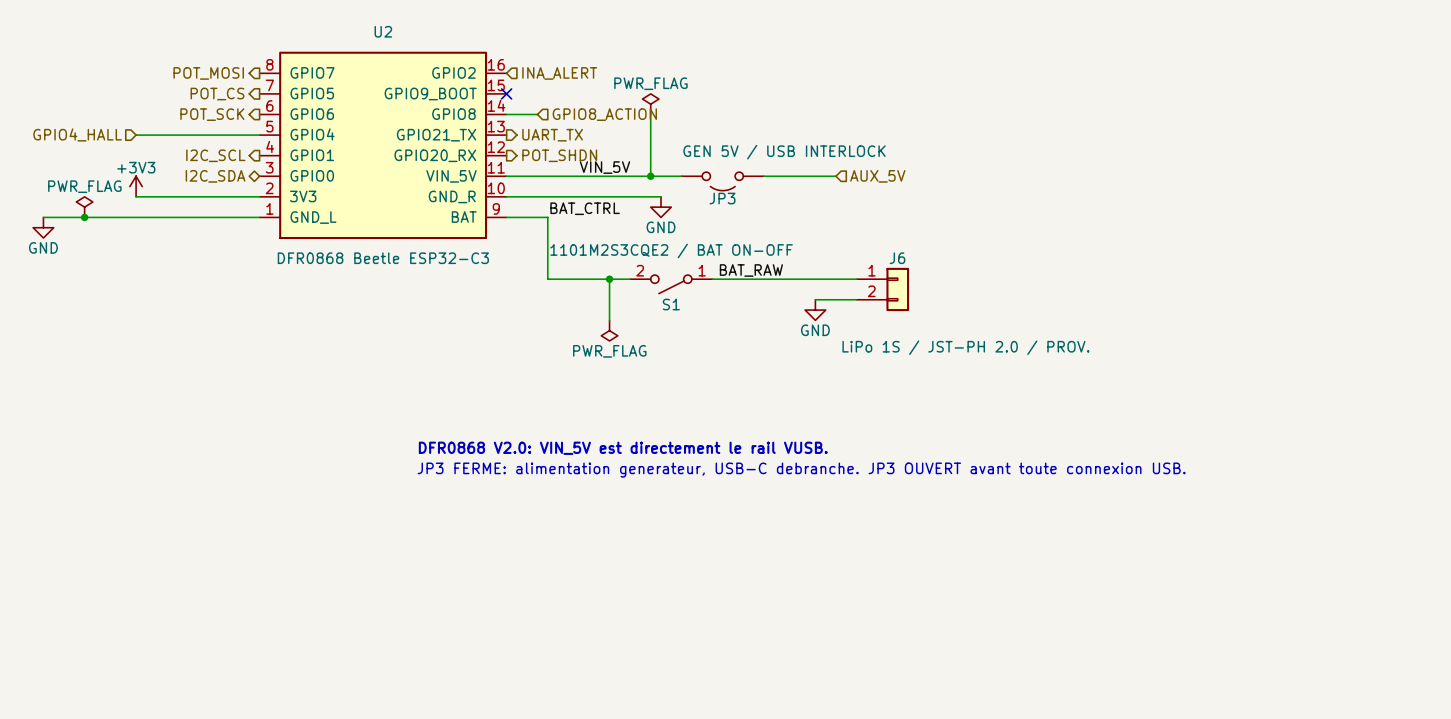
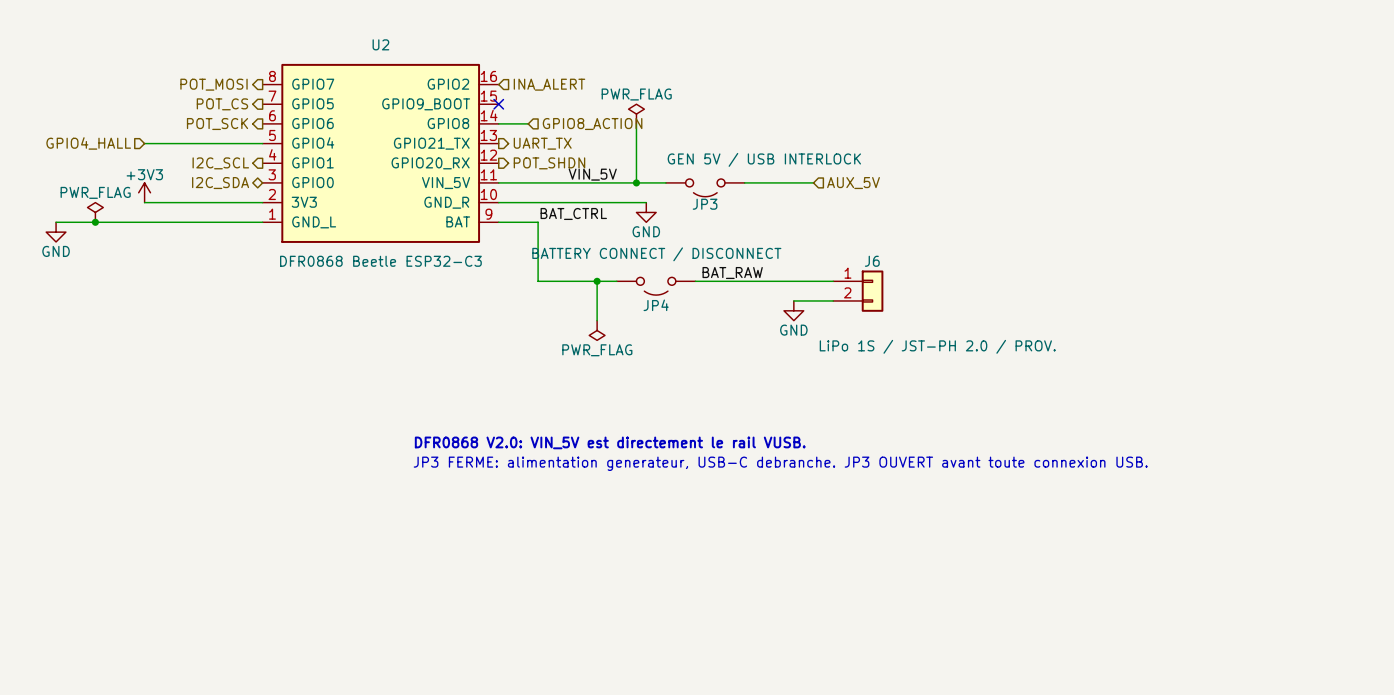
S1: 1101M2S3CQE2 / BAT ON-OFF (671, 284) -> none
JP4: none -> BATTERY CONNECT / DISCONNECT (656, 286)

